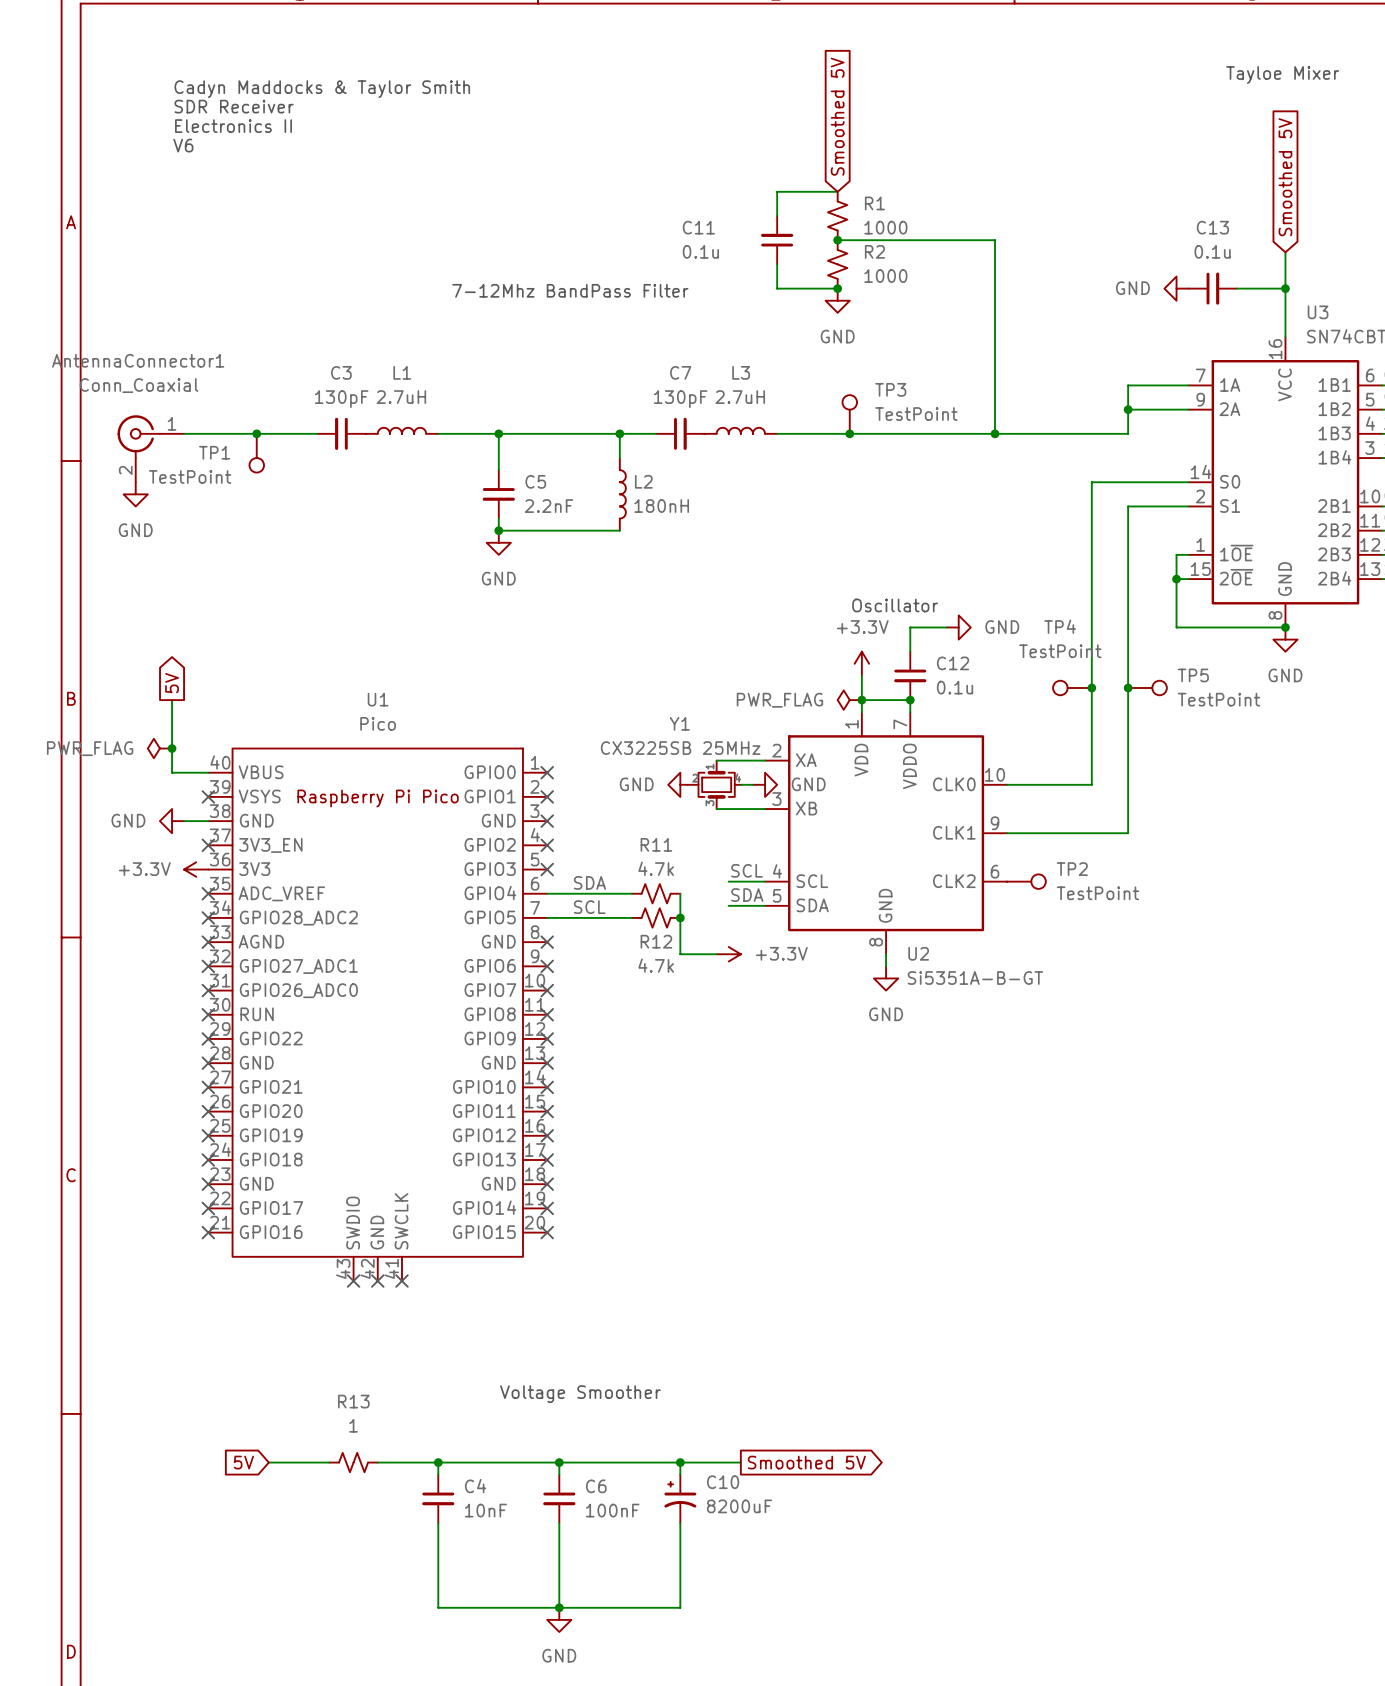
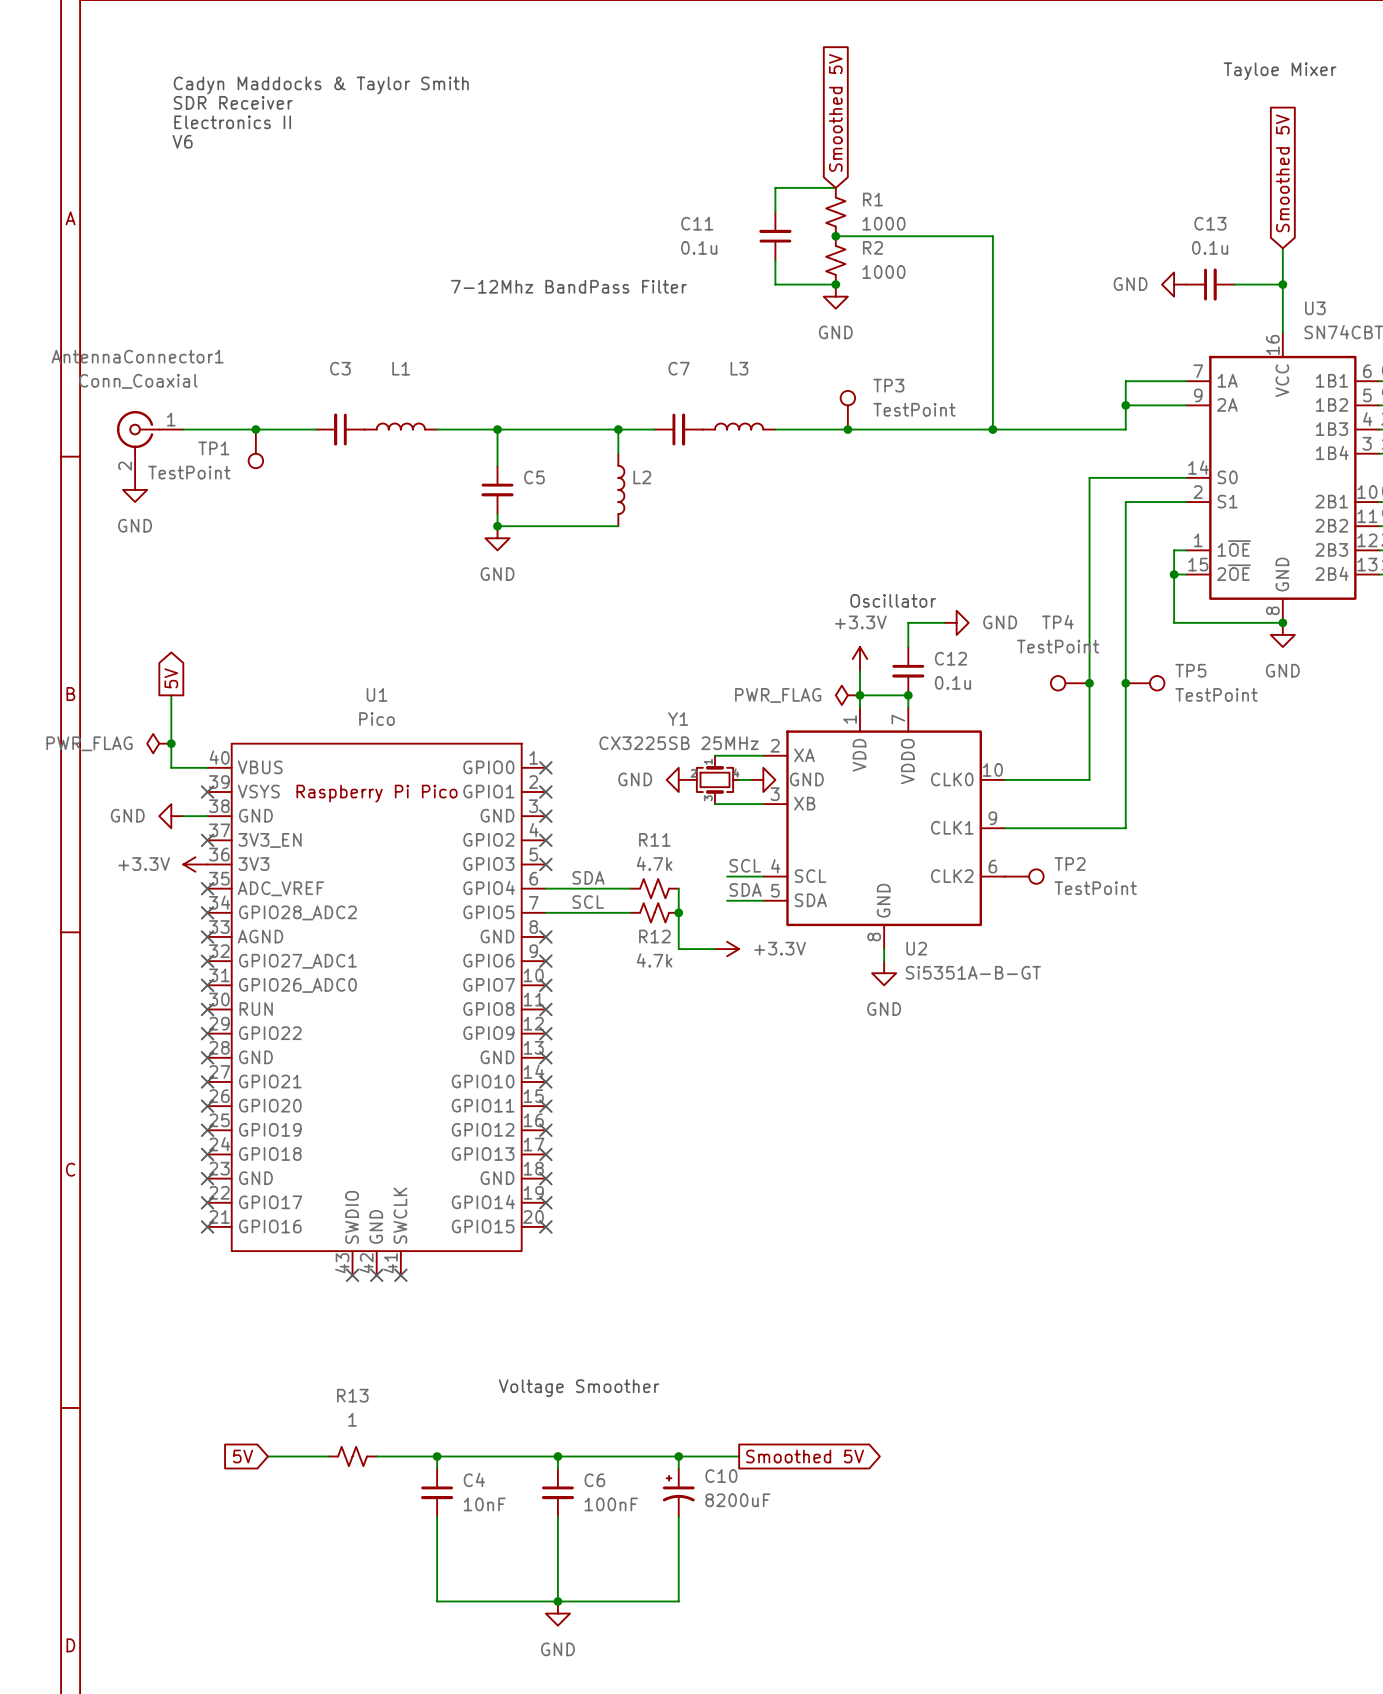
L1 value: 2.7uH (401, 397) -> none
L3 value: 2.7uH (740, 397) -> none
C3 value: 130pF (341, 399) -> none
C7 value: 130pF (680, 399) -> none
C5 value: 2.2nF (549, 506) -> none
L2 value: 180nH (661, 506) -> none

